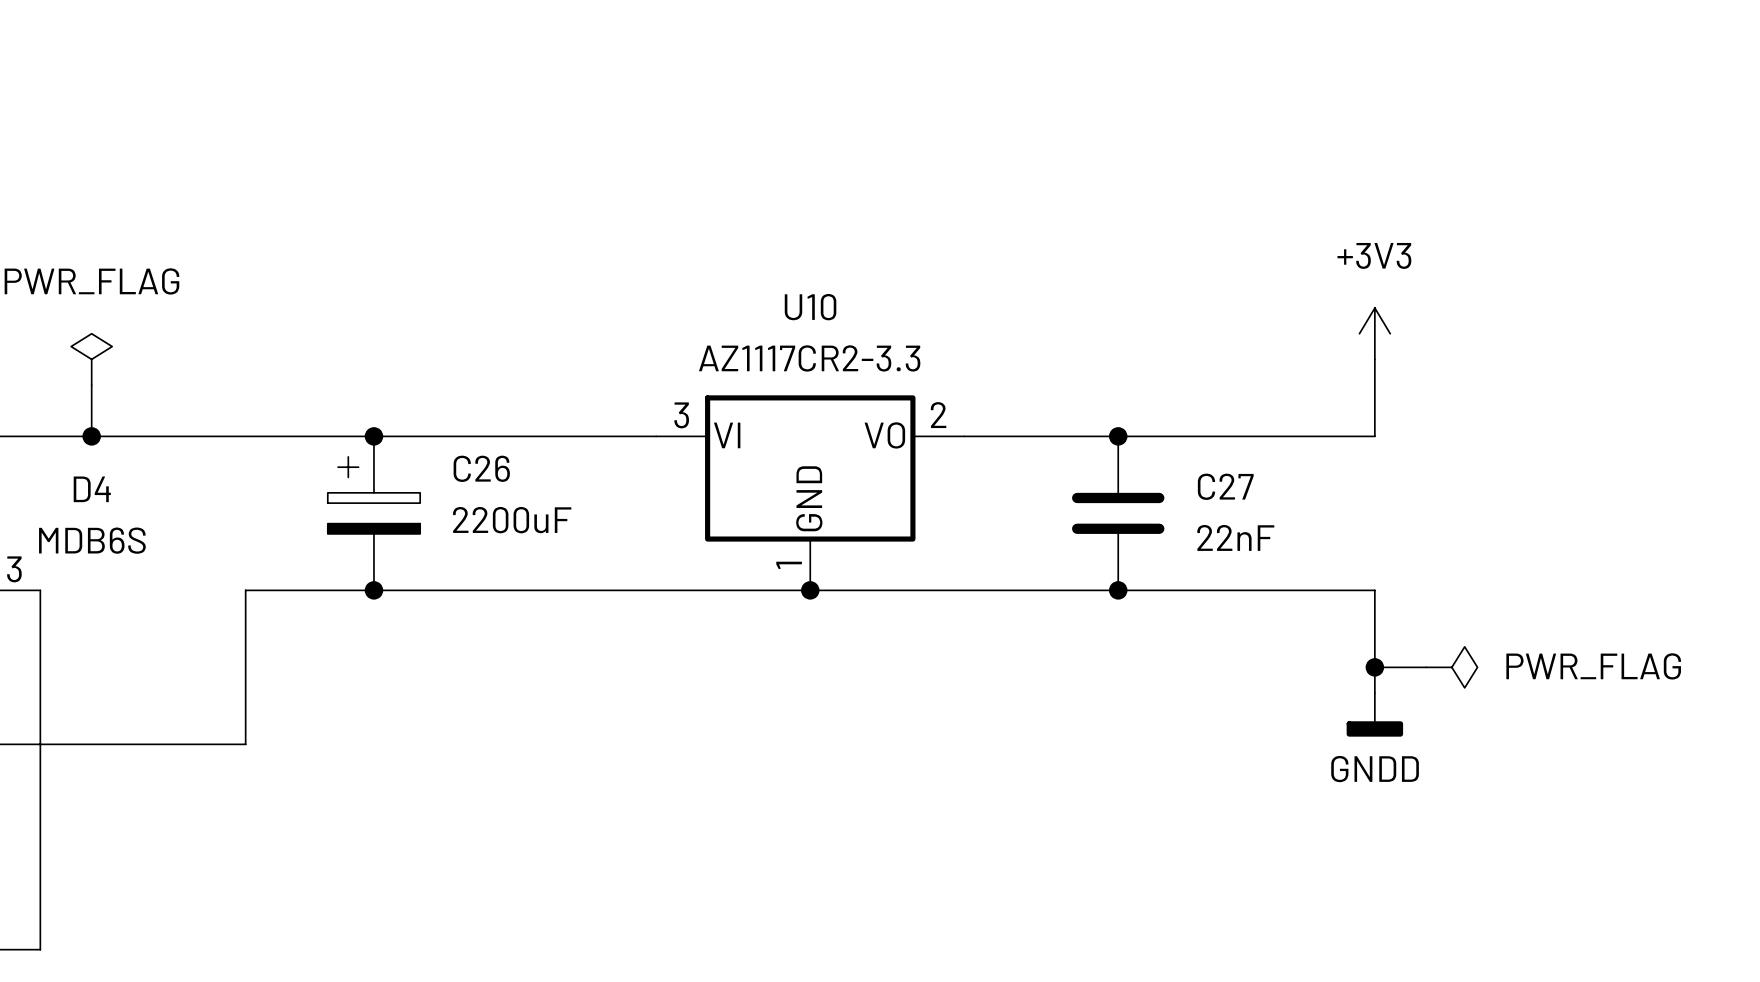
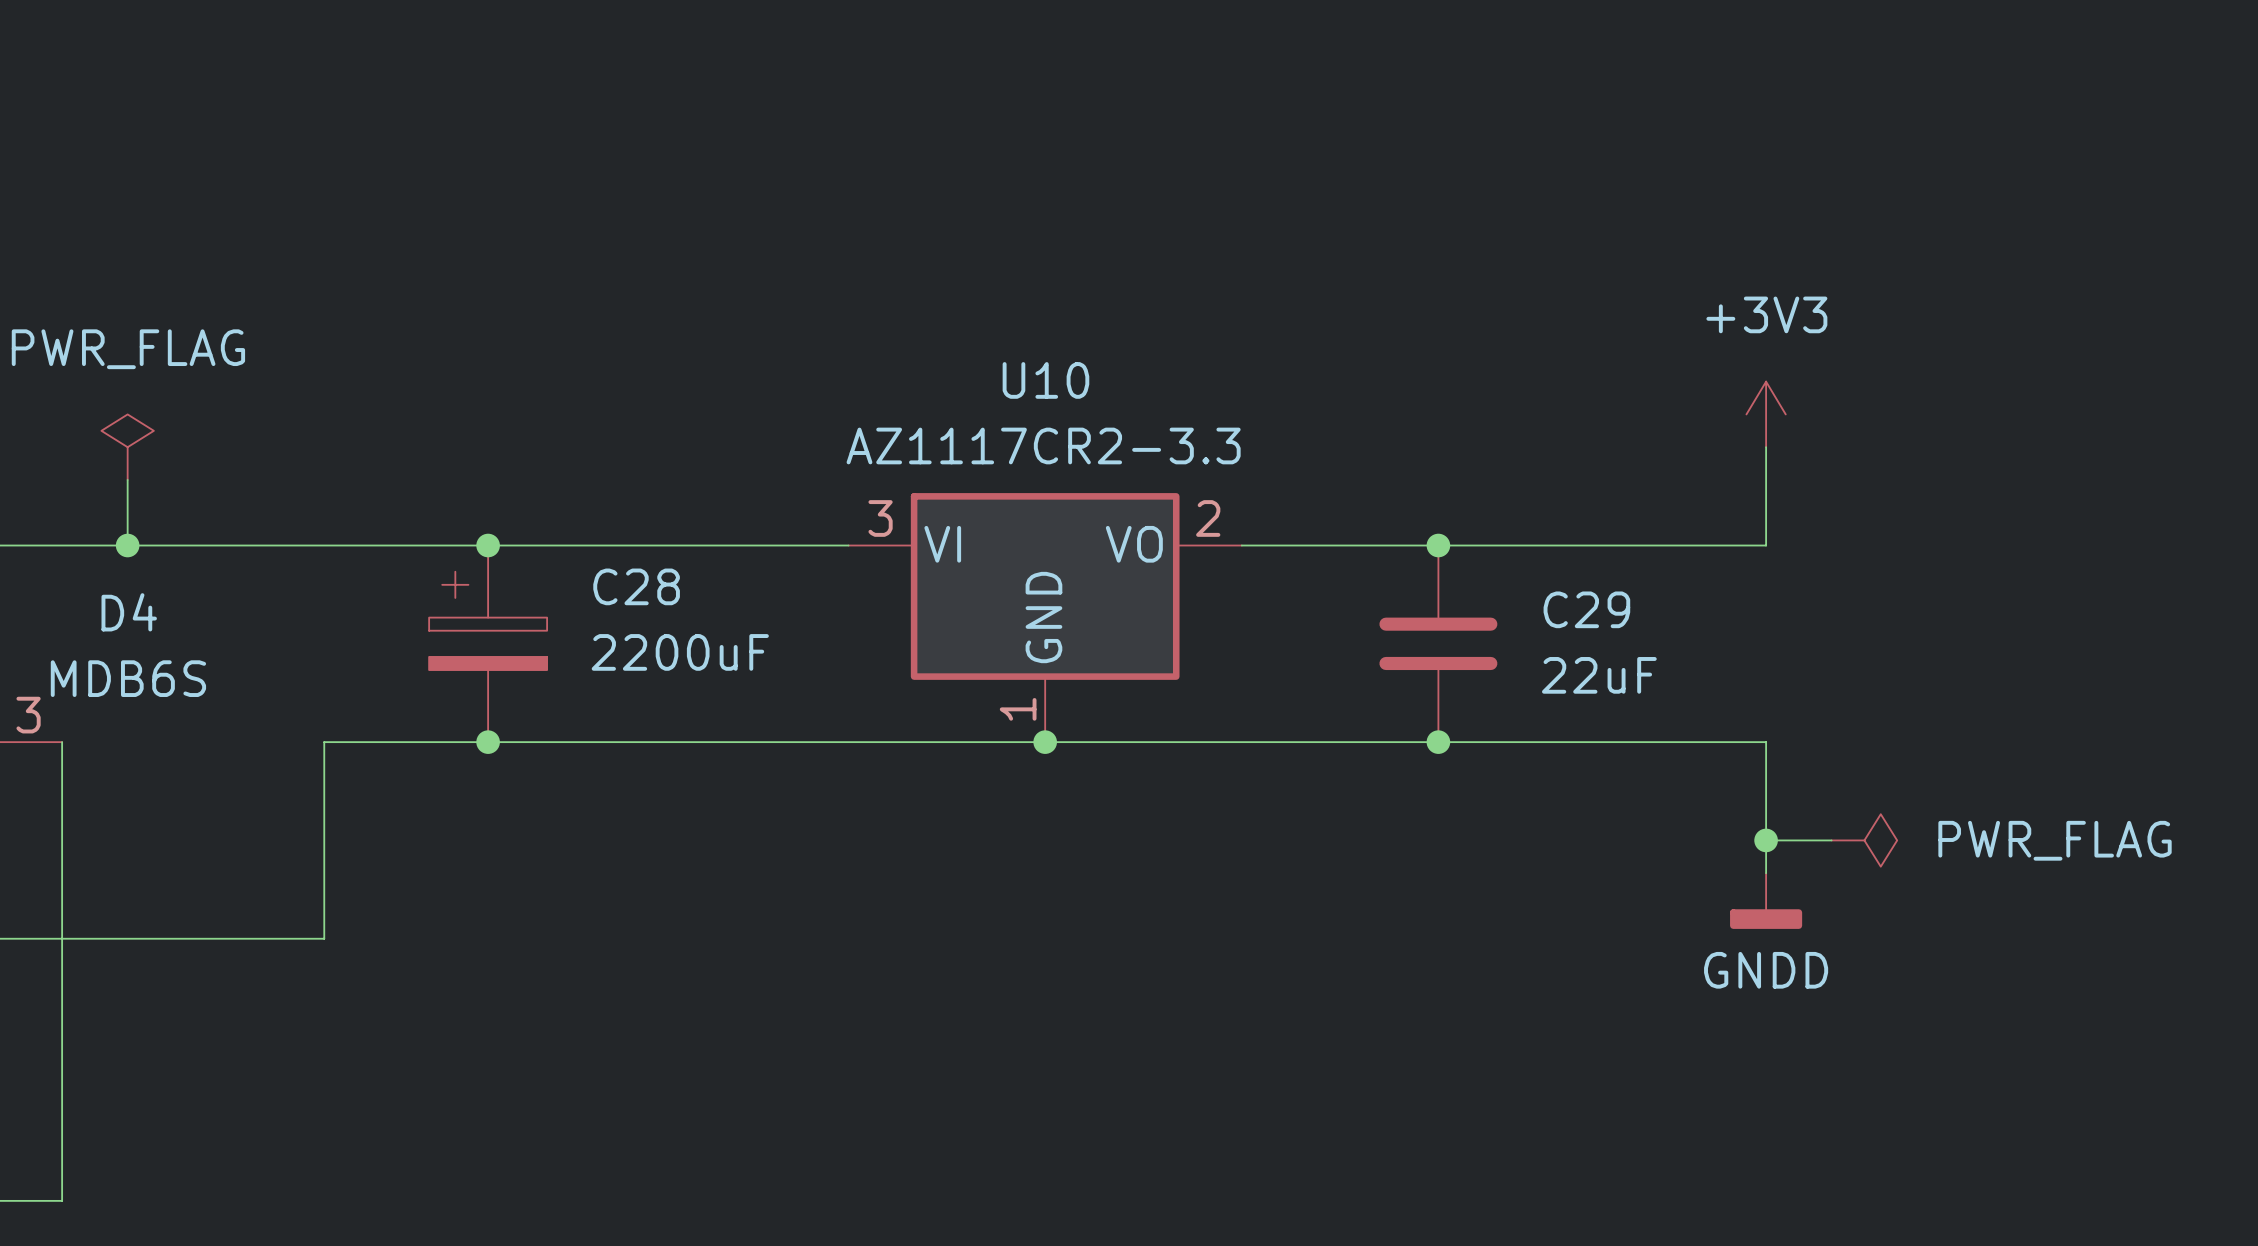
C26 name: C26 (481, 468) -> C28 (636, 586)
C27 name: C27 (1225, 486) -> C29 (1586, 609)
C27 value: 22nF (1235, 537) -> 22uF (1599, 675)

